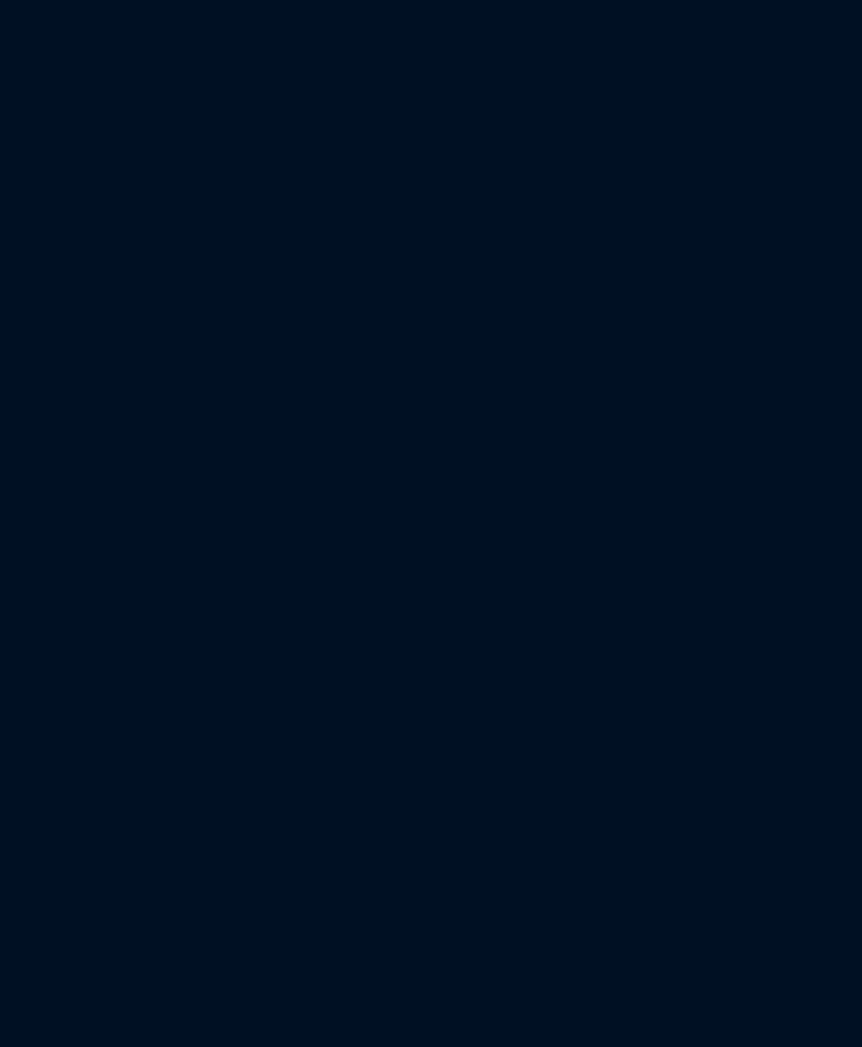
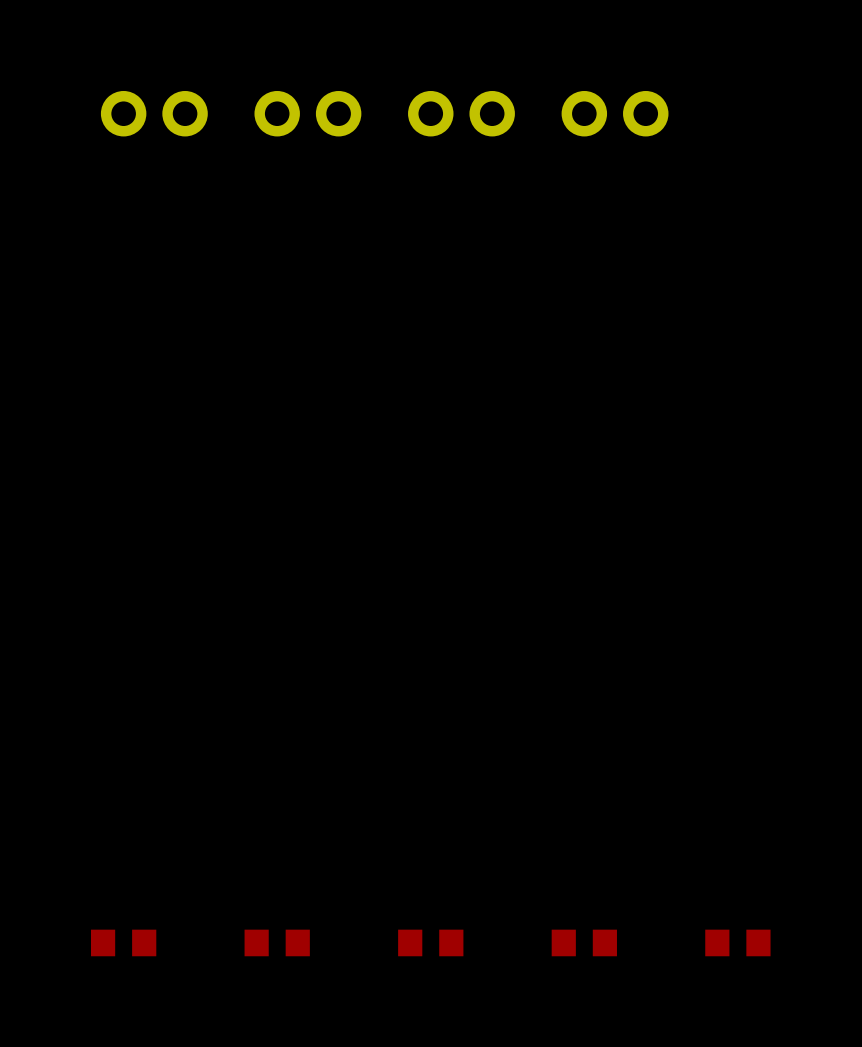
part: none -> (154, 113)
part: none -> (307, 113)
part: none -> (461, 113)
part: none -> (615, 113)
part: none -> (123, 942)
part: none -> (277, 942)
part: none -> (430, 942)
part: none -> (584, 942)
part: none -> (737, 942)

